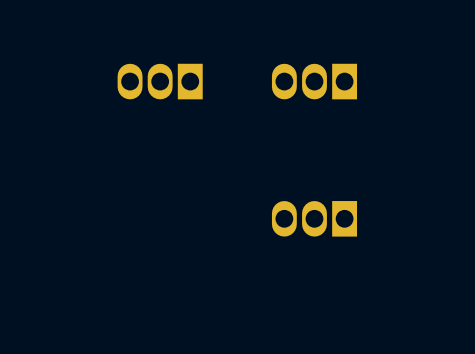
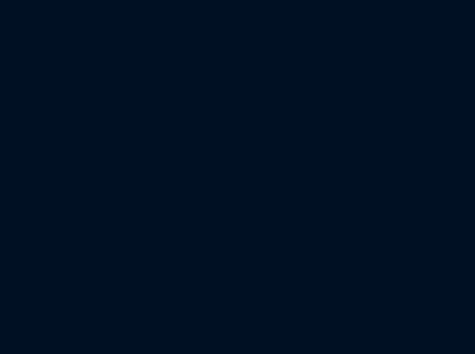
part: (160, 81) -> none
part: (314, 81) -> none
part: (314, 218) -> none

